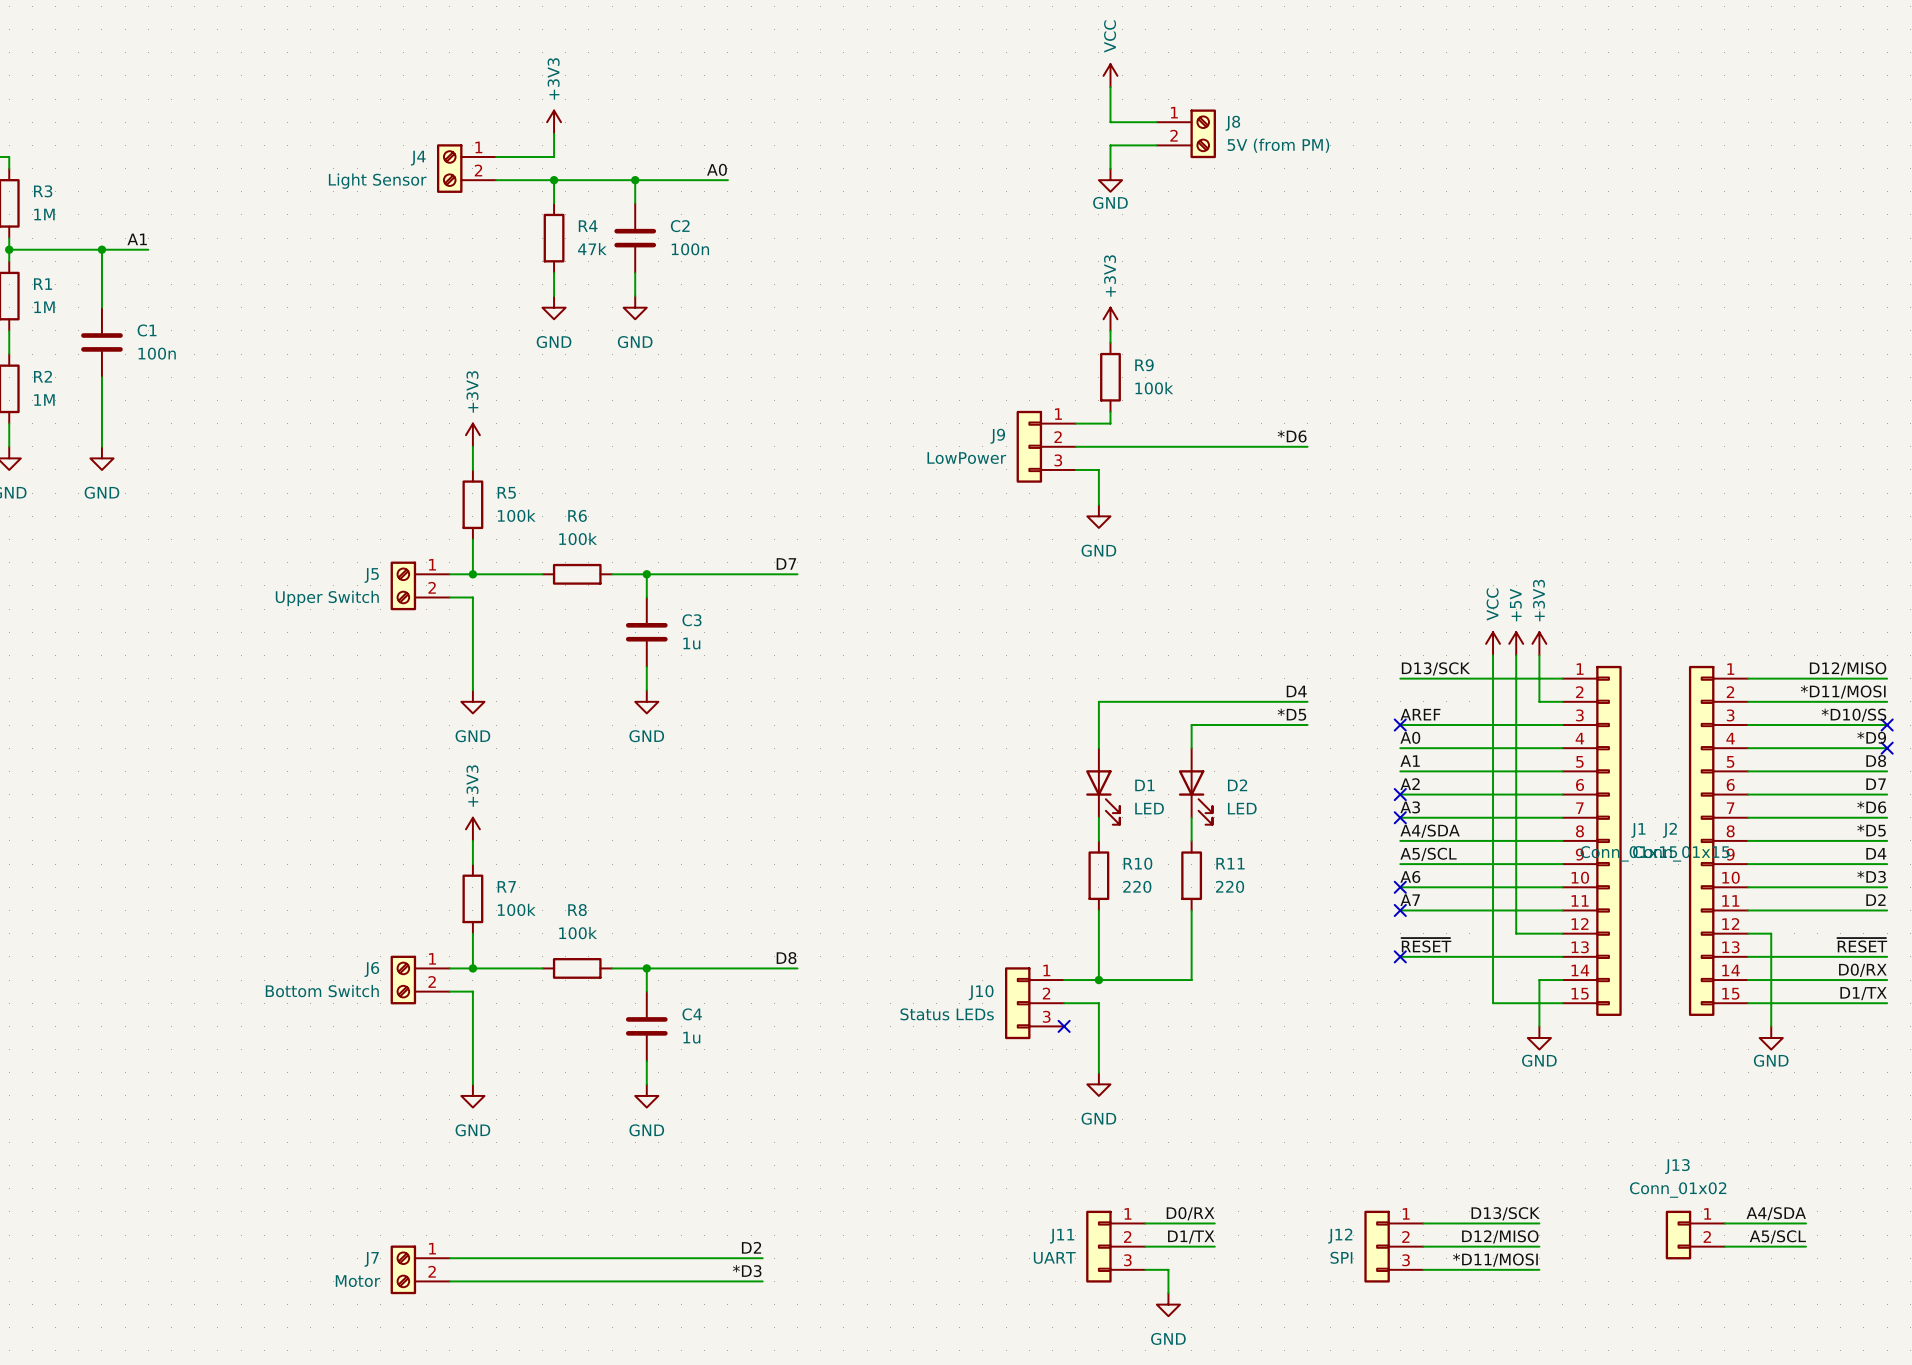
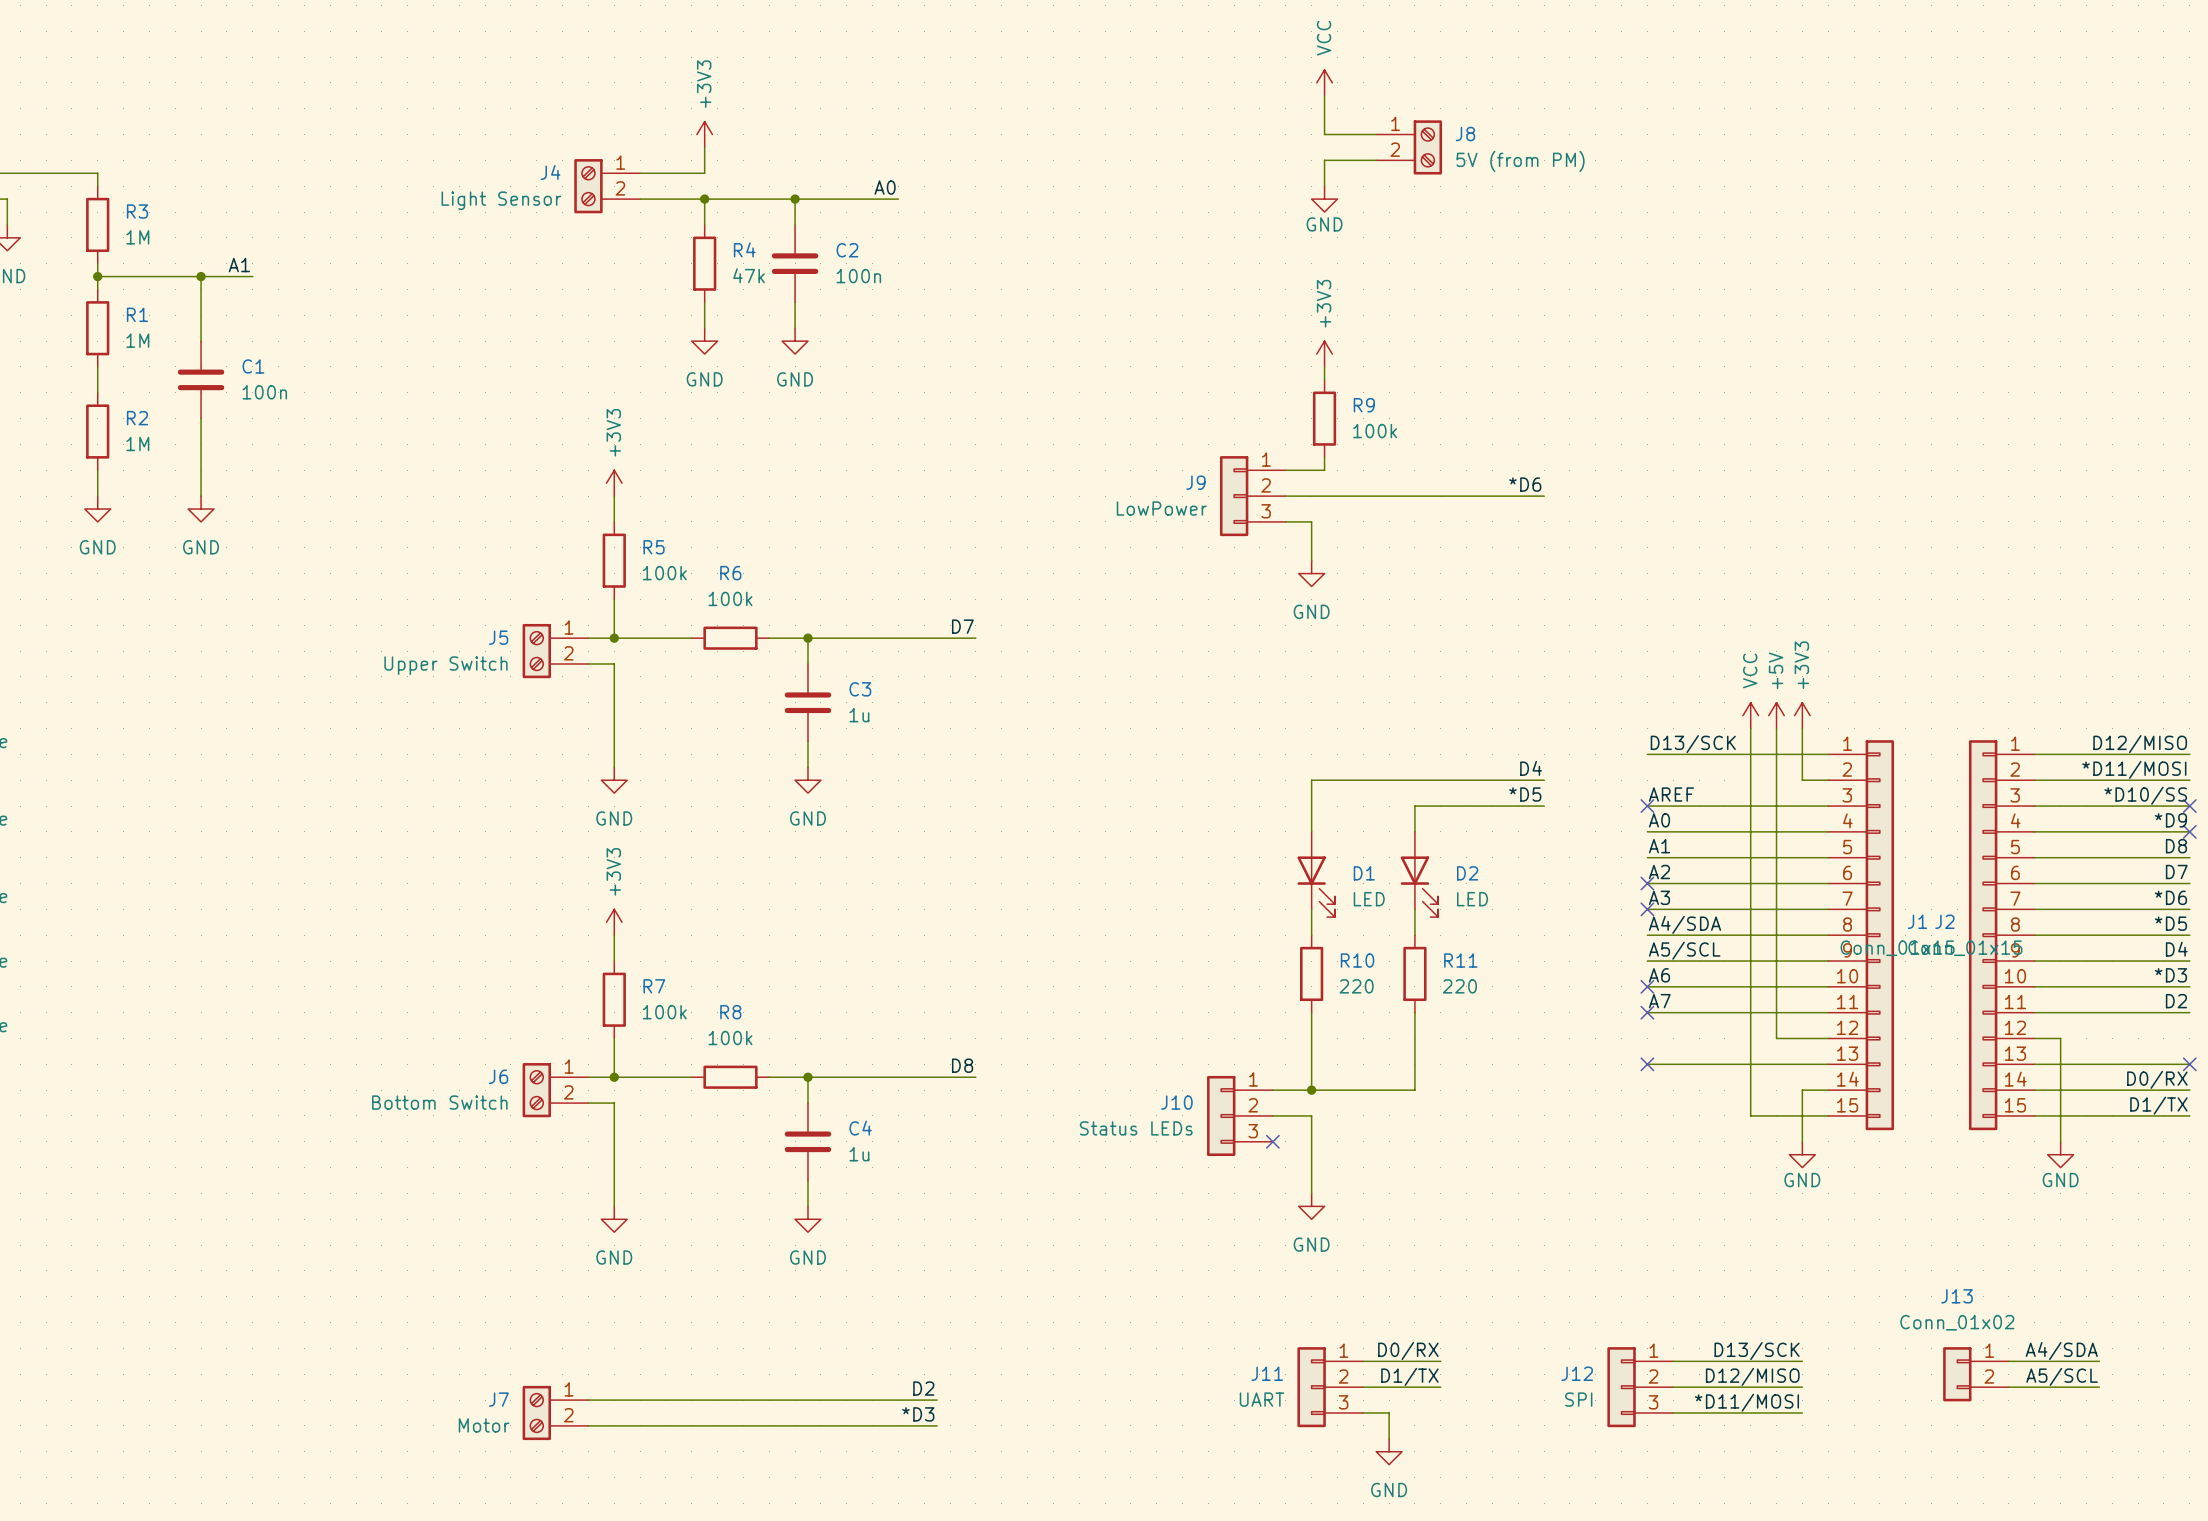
label: ~{RESET} (1426, 945) -> none
label: ~{RESET} (1862, 945) -> none
no-connect mark: none -> (2189, 1064)

